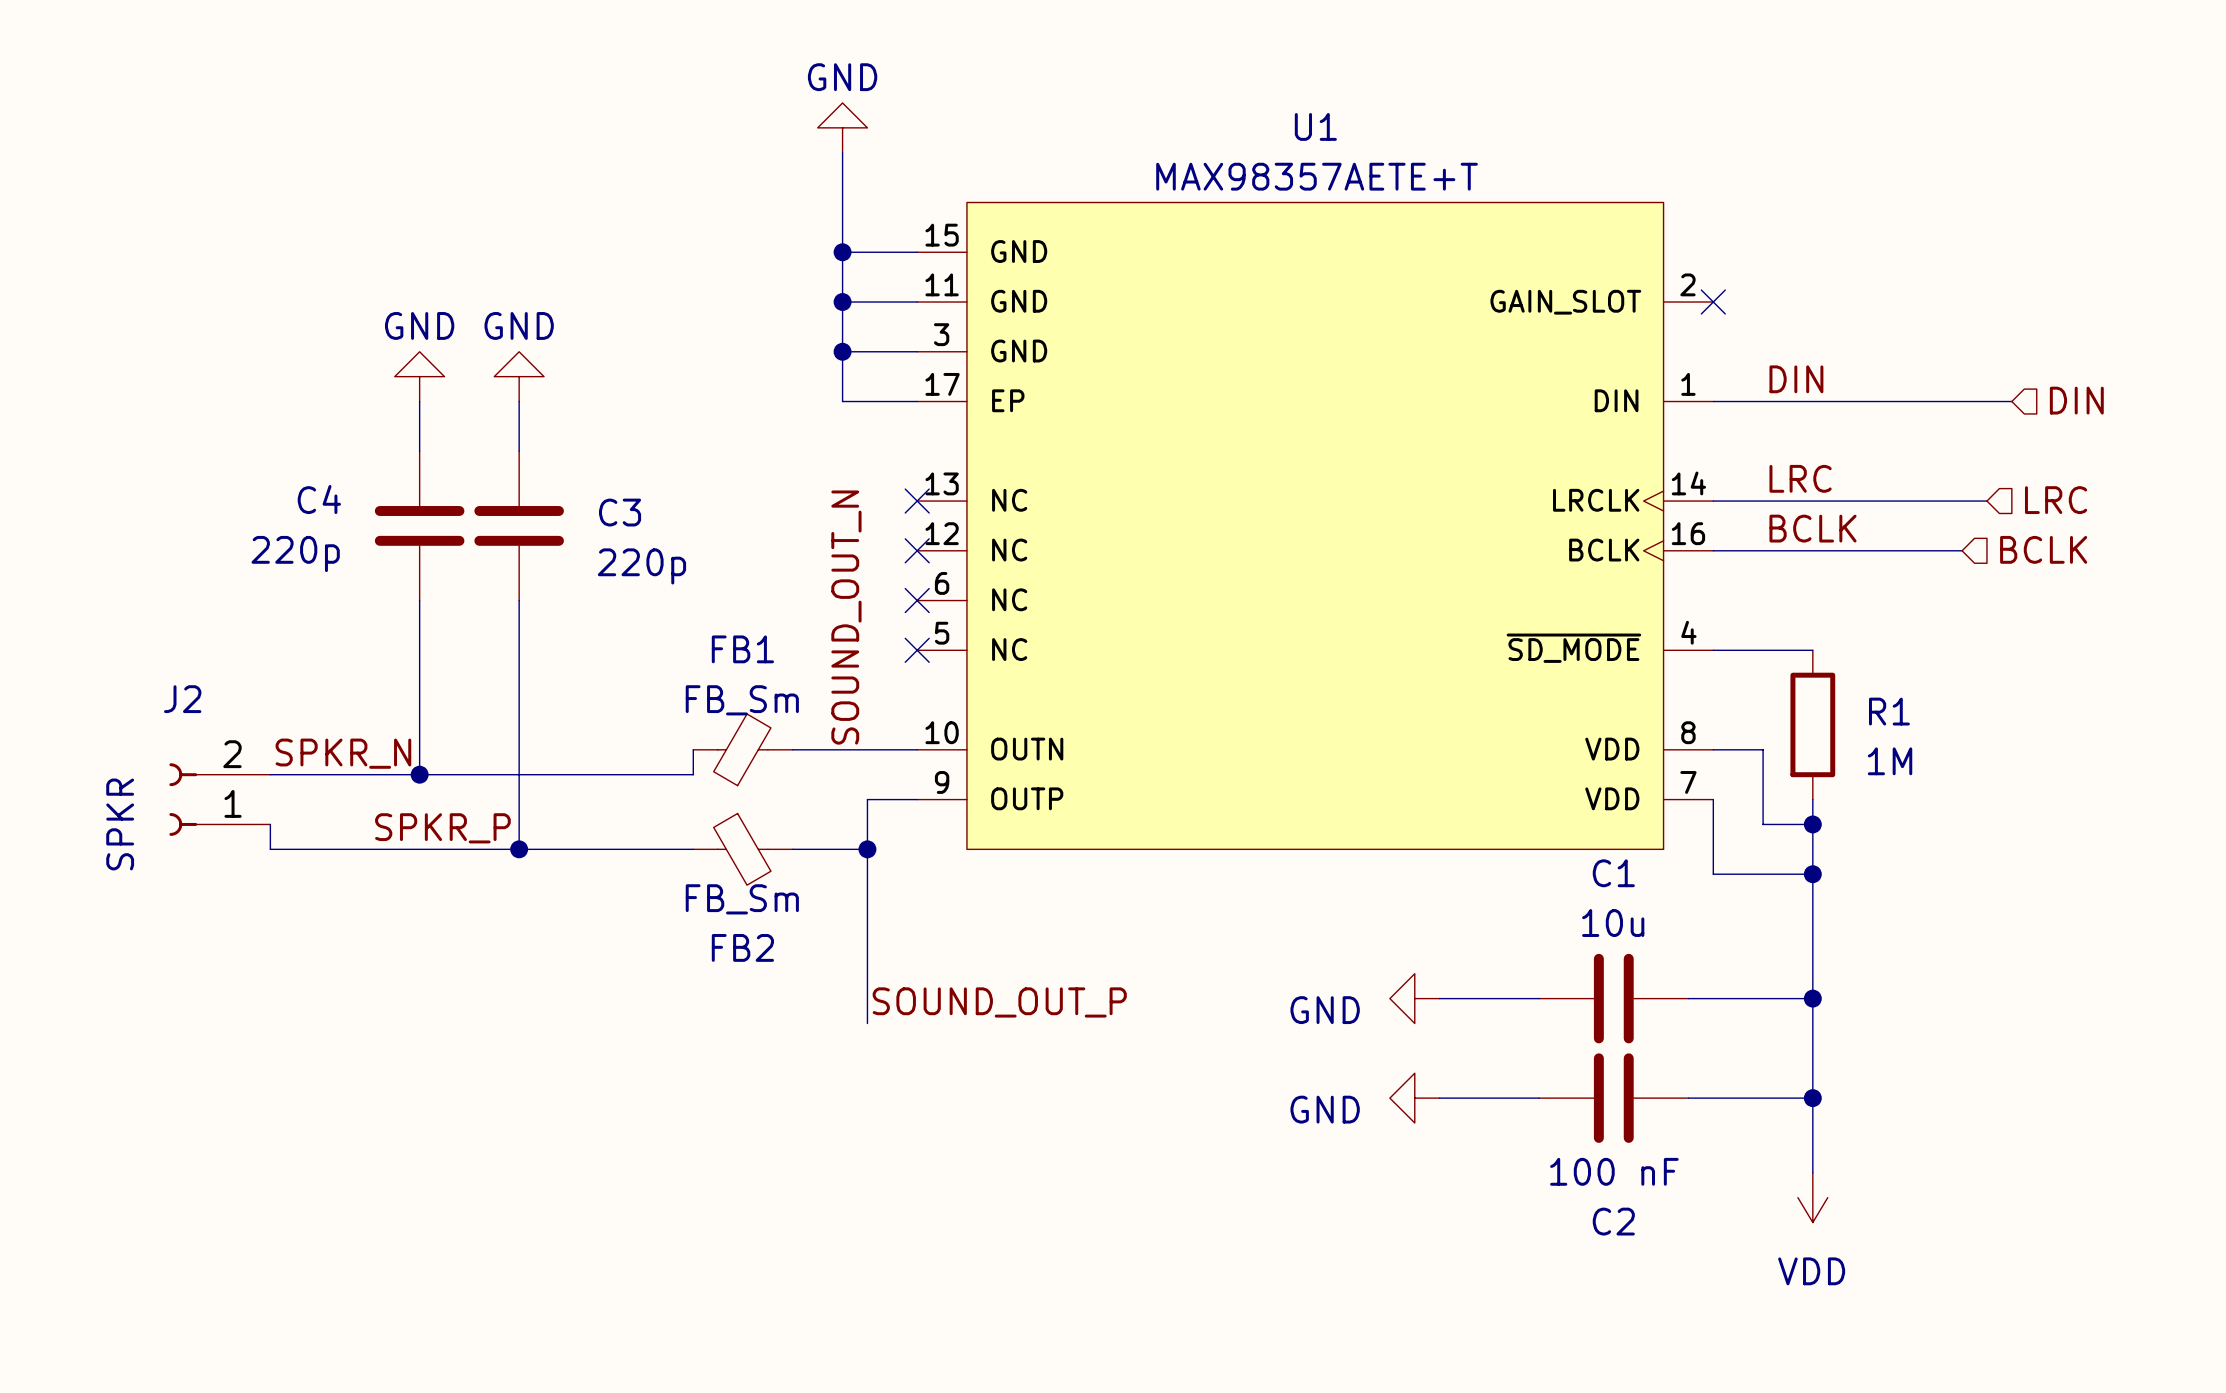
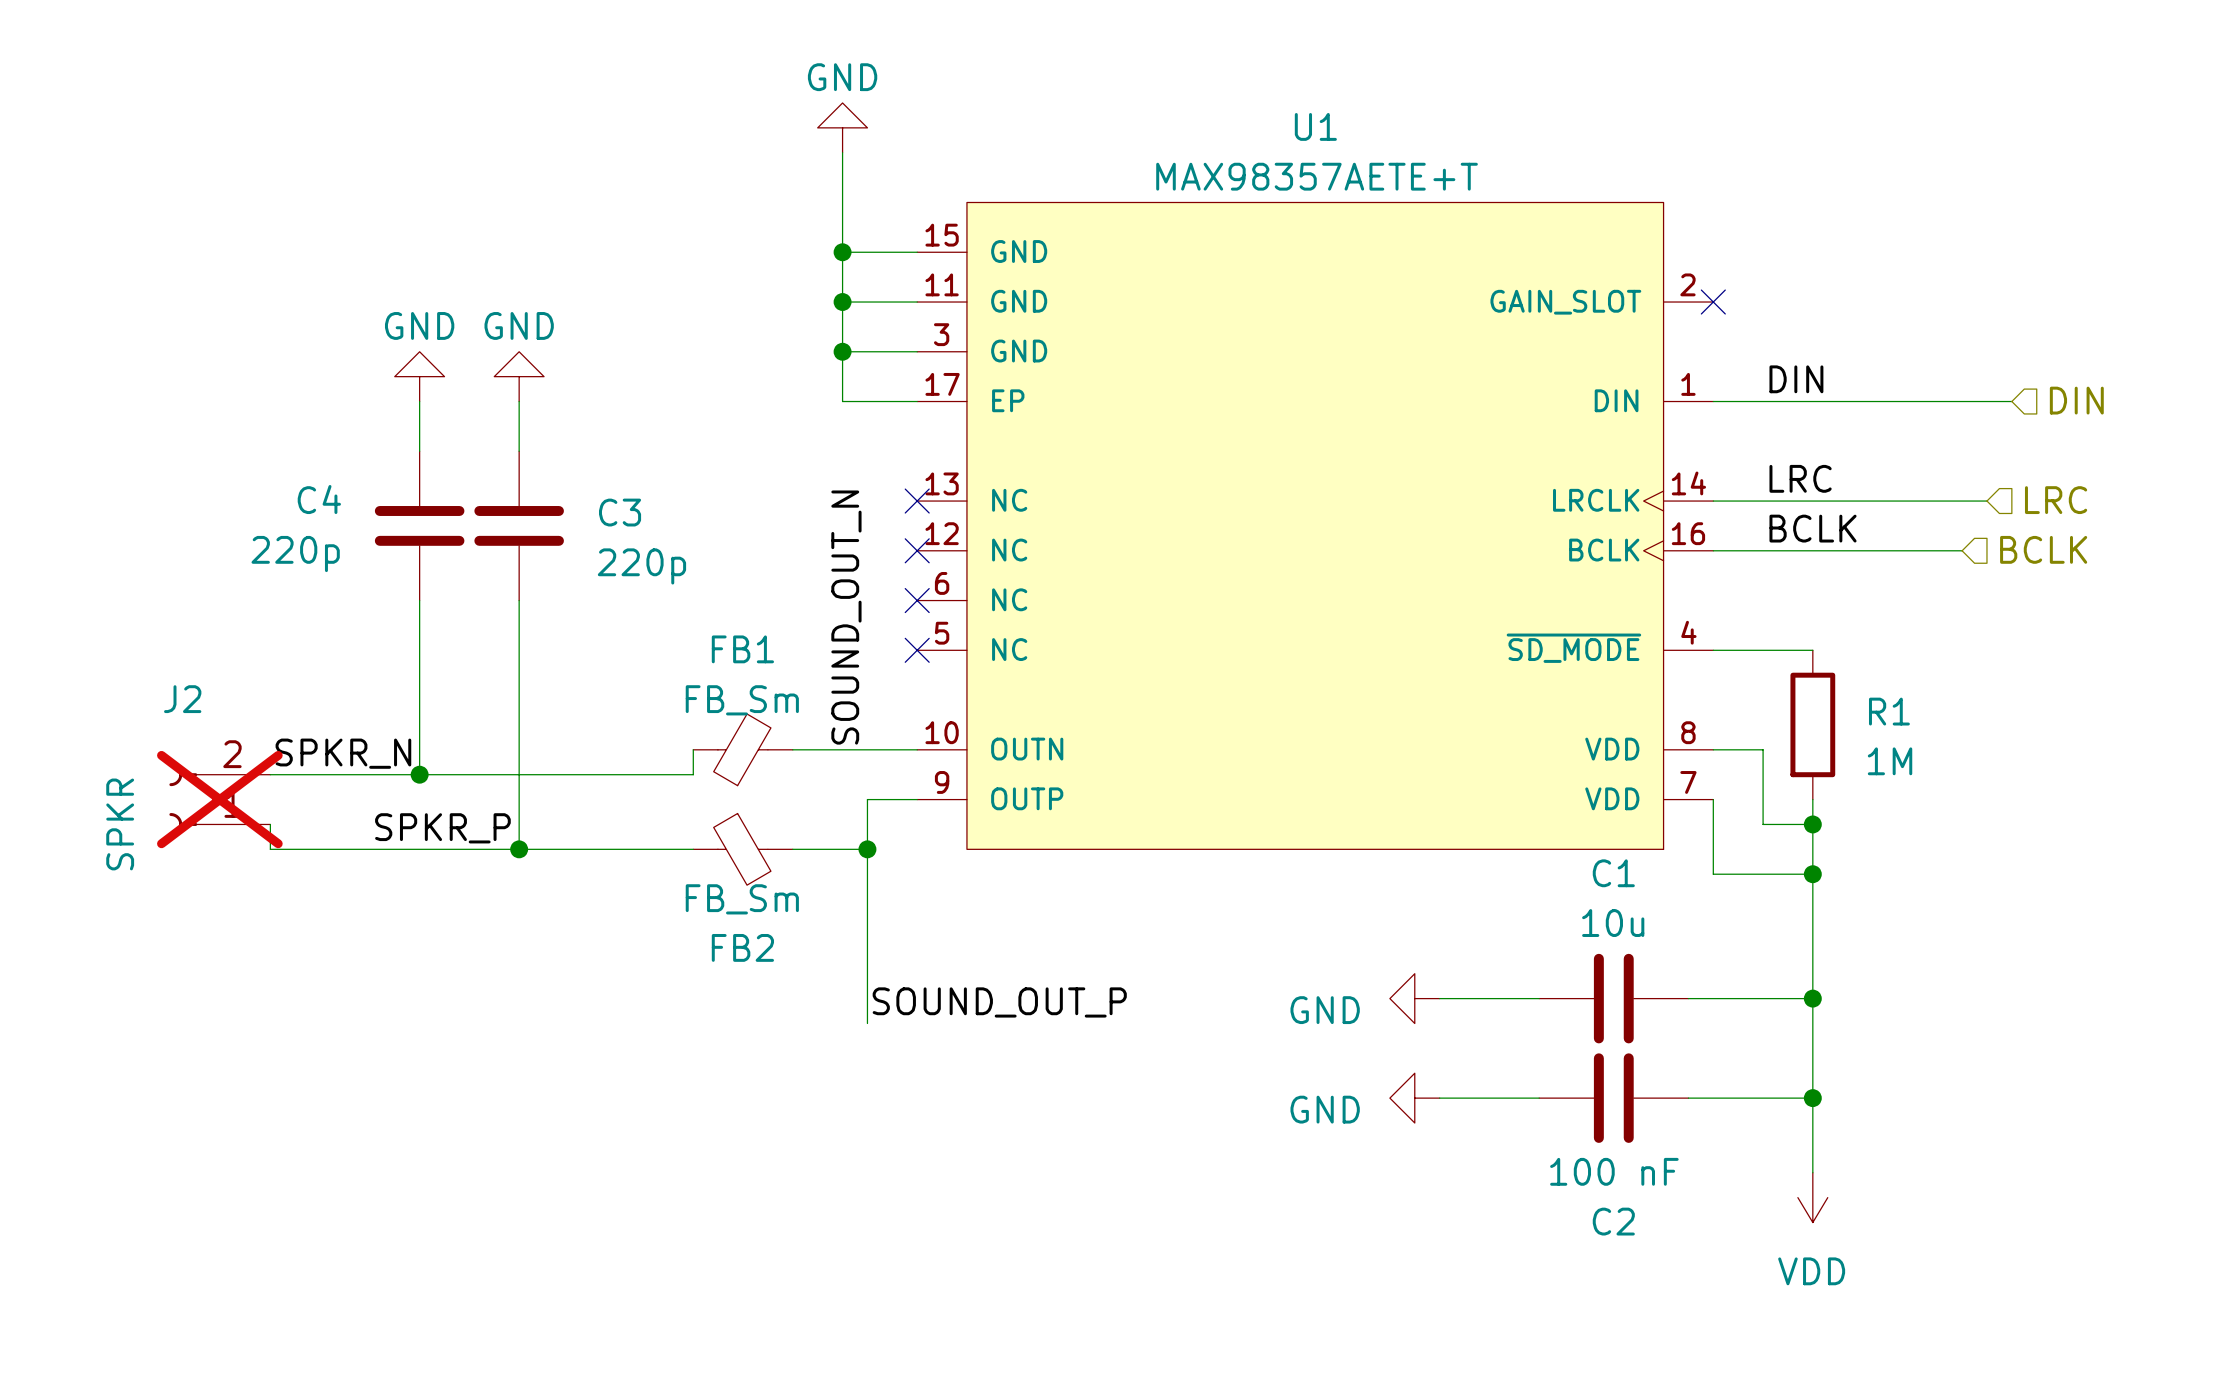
J2 do-not-place cross: none -> (219, 799)

